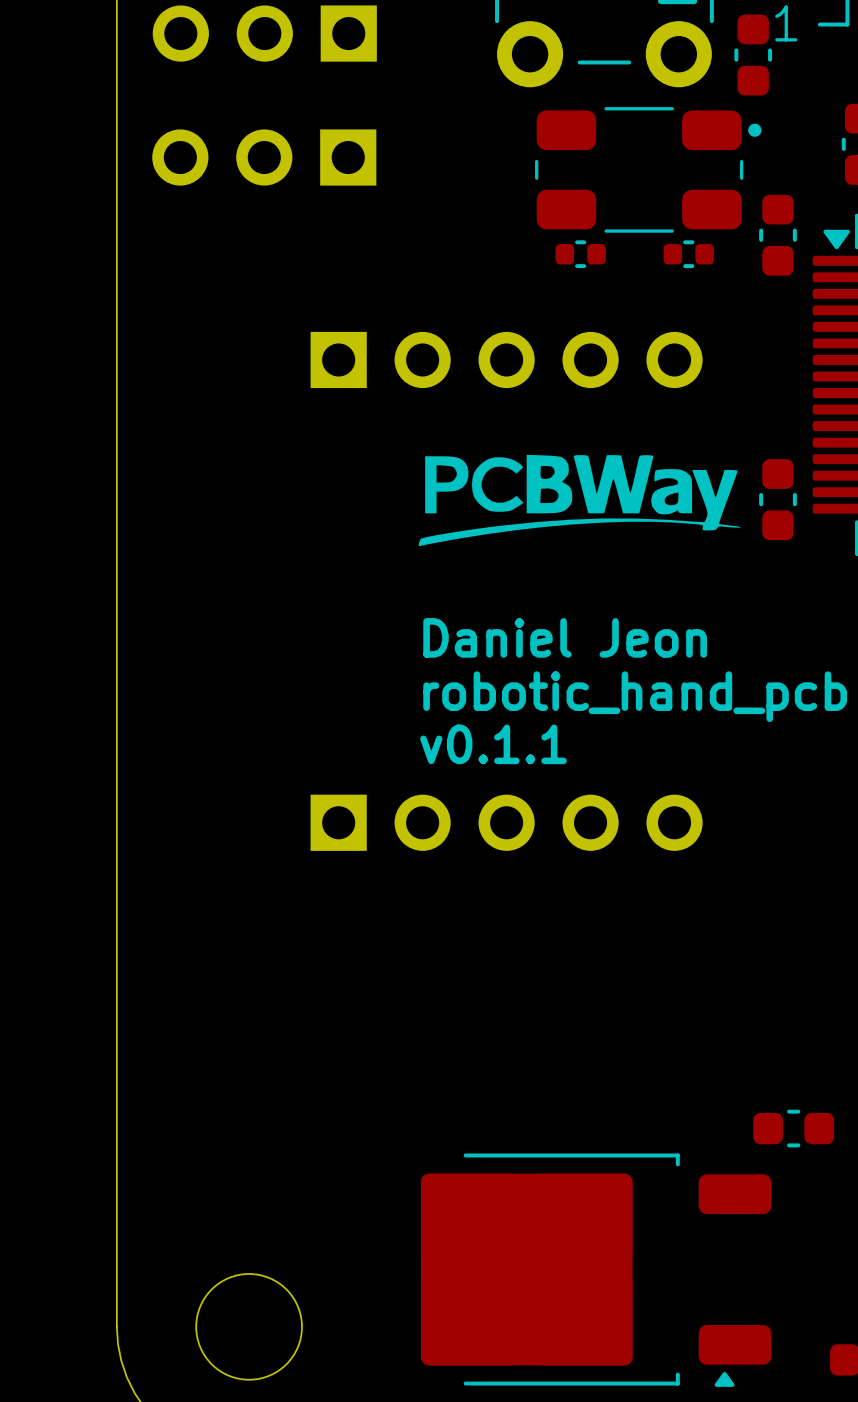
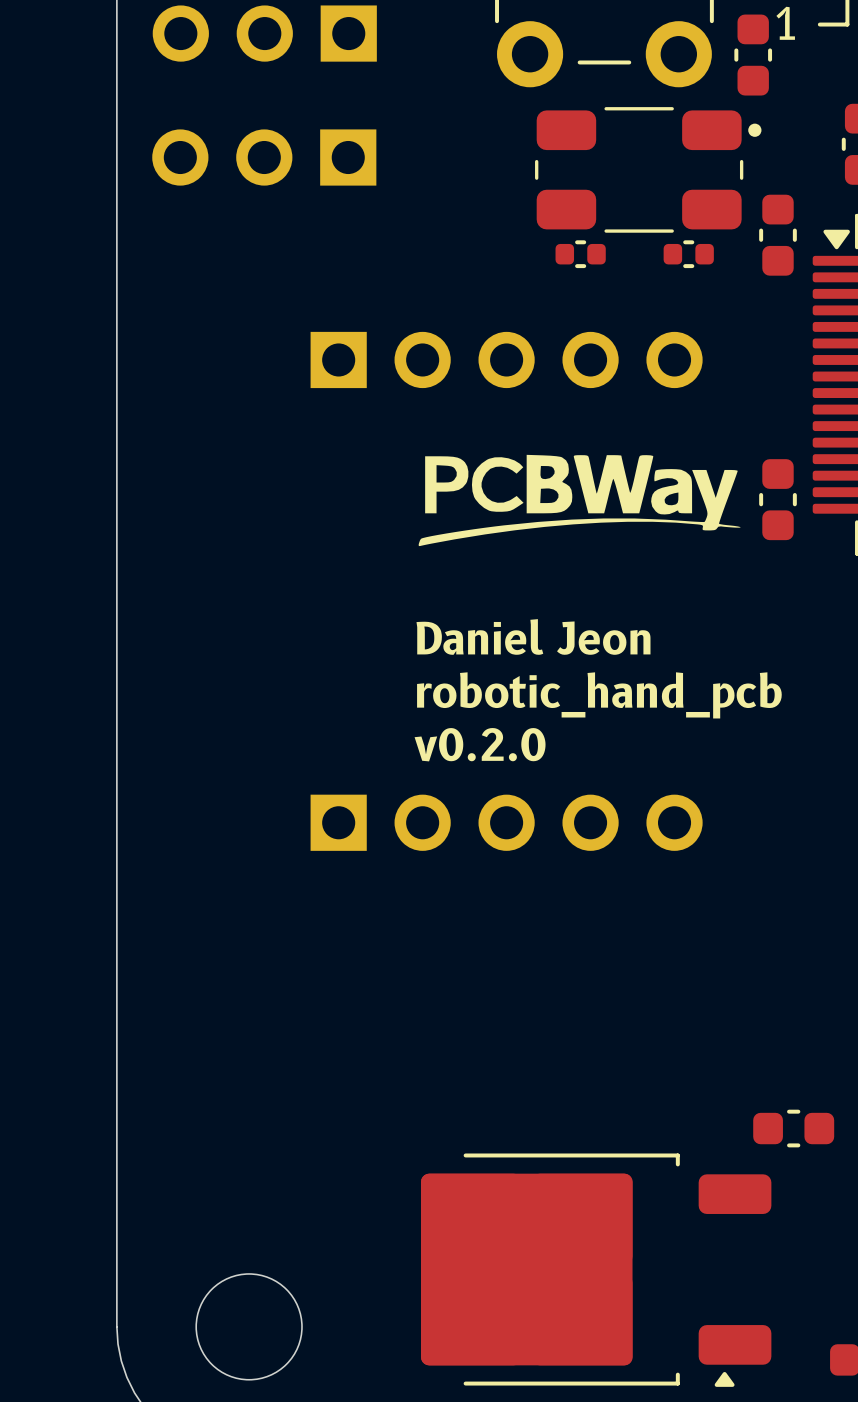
text: v0.1.1 (493, 744) -> v0.2.0 (480, 744)

